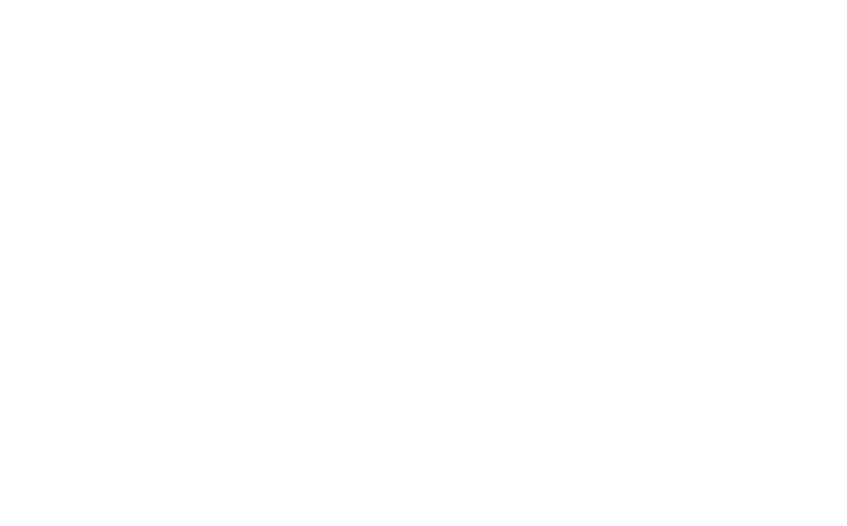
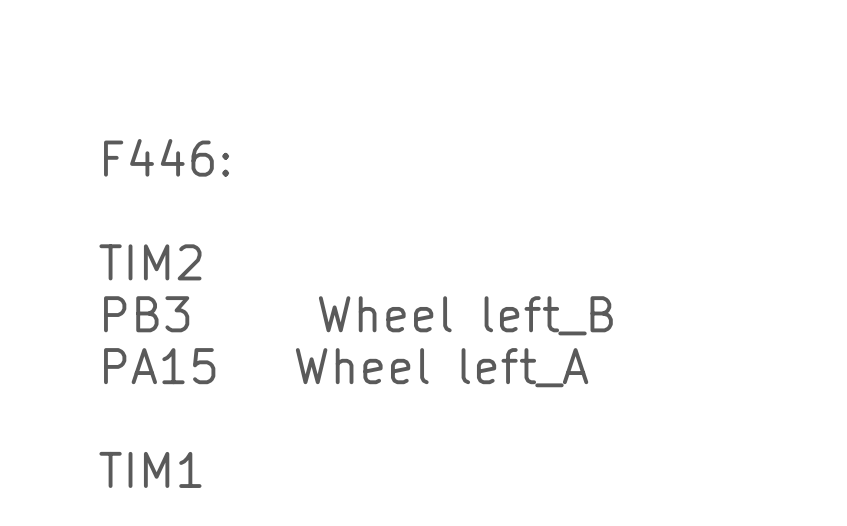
text: none -> F446: (166, 157)
text: none -> TIM2 (150, 262)
text: none -> PB3 Wheel left_B (358, 315)
text: none -> PA15 Wheel left_A (346, 367)
text: none -> TIM1 (150, 469)

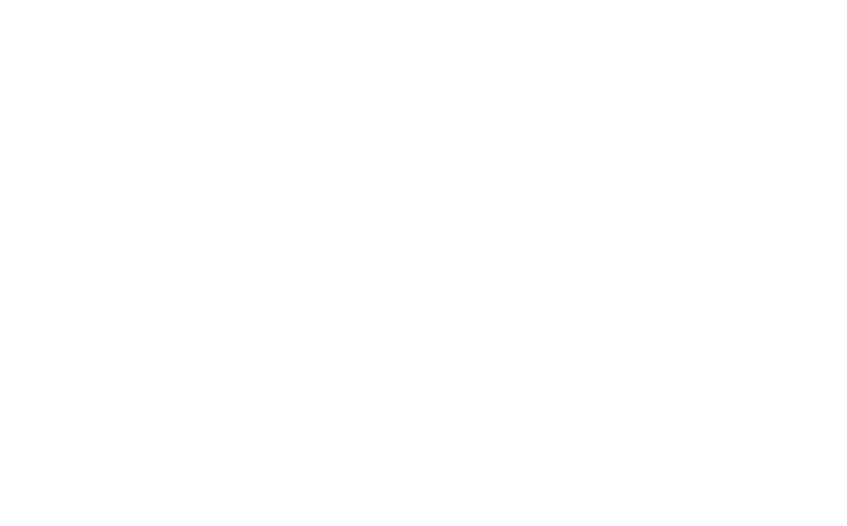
text: F446: (166, 157) -> none
text: TIM2 (150, 262) -> none
text: PB3 Wheel left_B (358, 315) -> none
text: PA15 Wheel left_A (346, 367) -> none
text: TIM1 (150, 469) -> none

